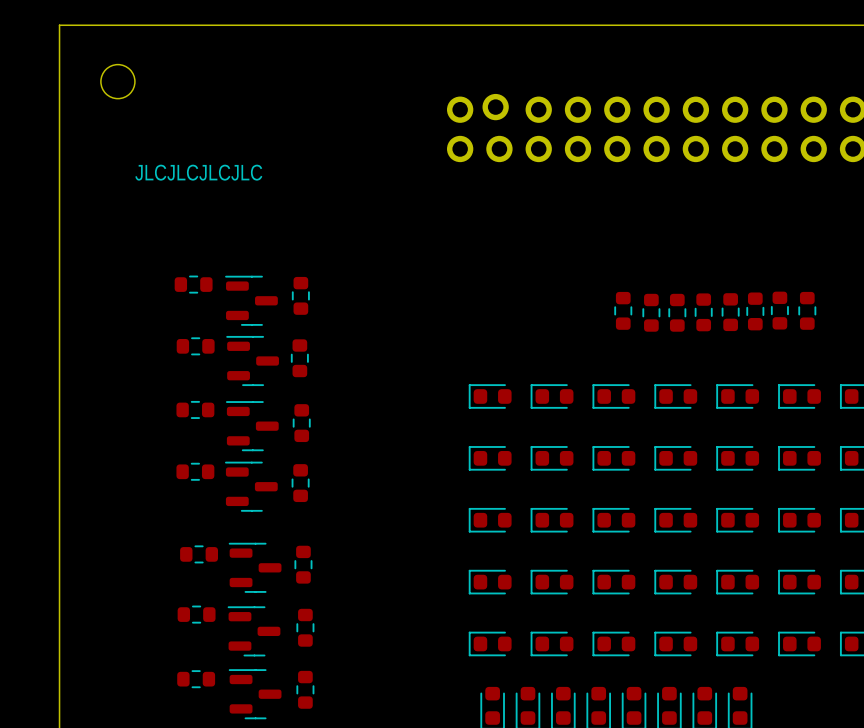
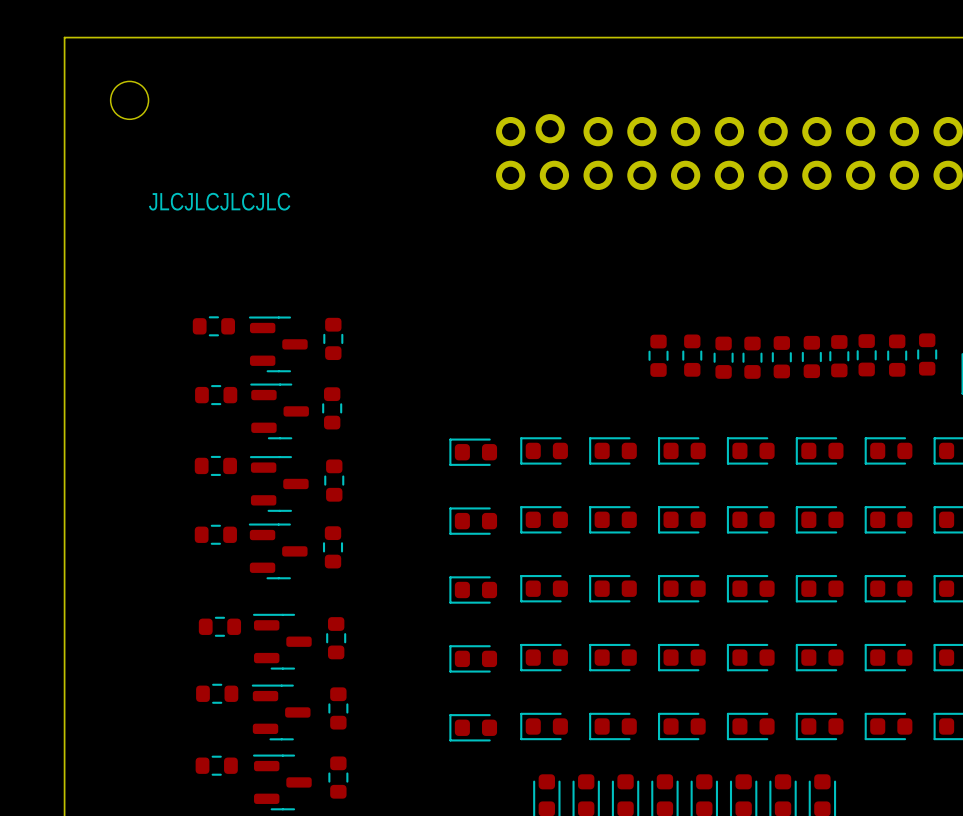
part: none -> (927, 354)
part: none -> (658, 355)
part: none -> (473, 452)
part: none -> (473, 521)
part: none -> (473, 590)
part: none -> (473, 658)
part: none -> (473, 727)

